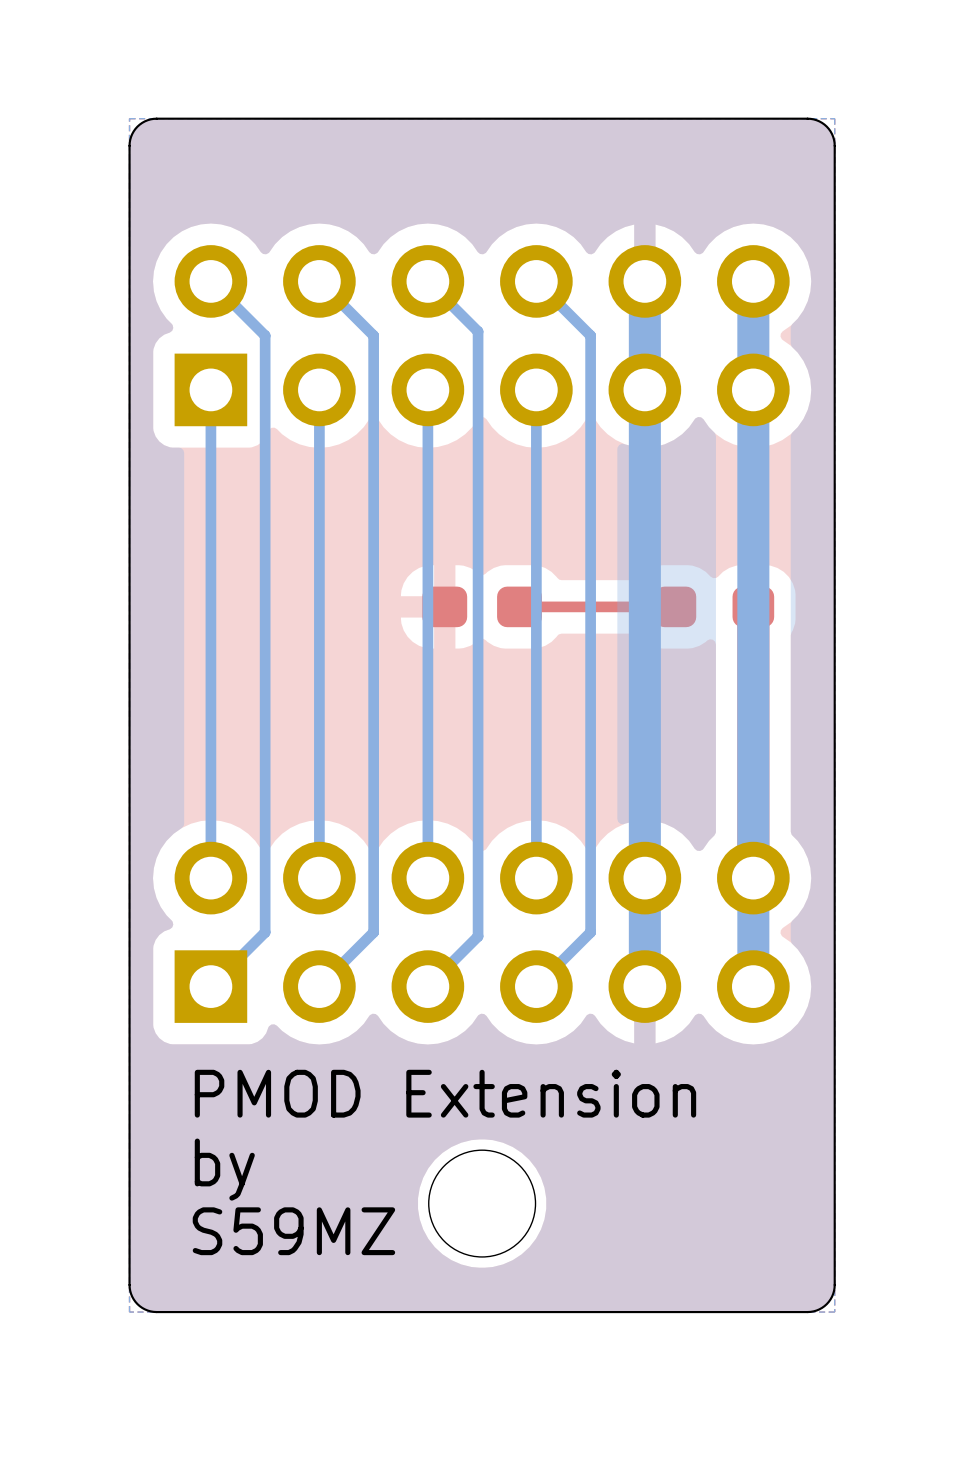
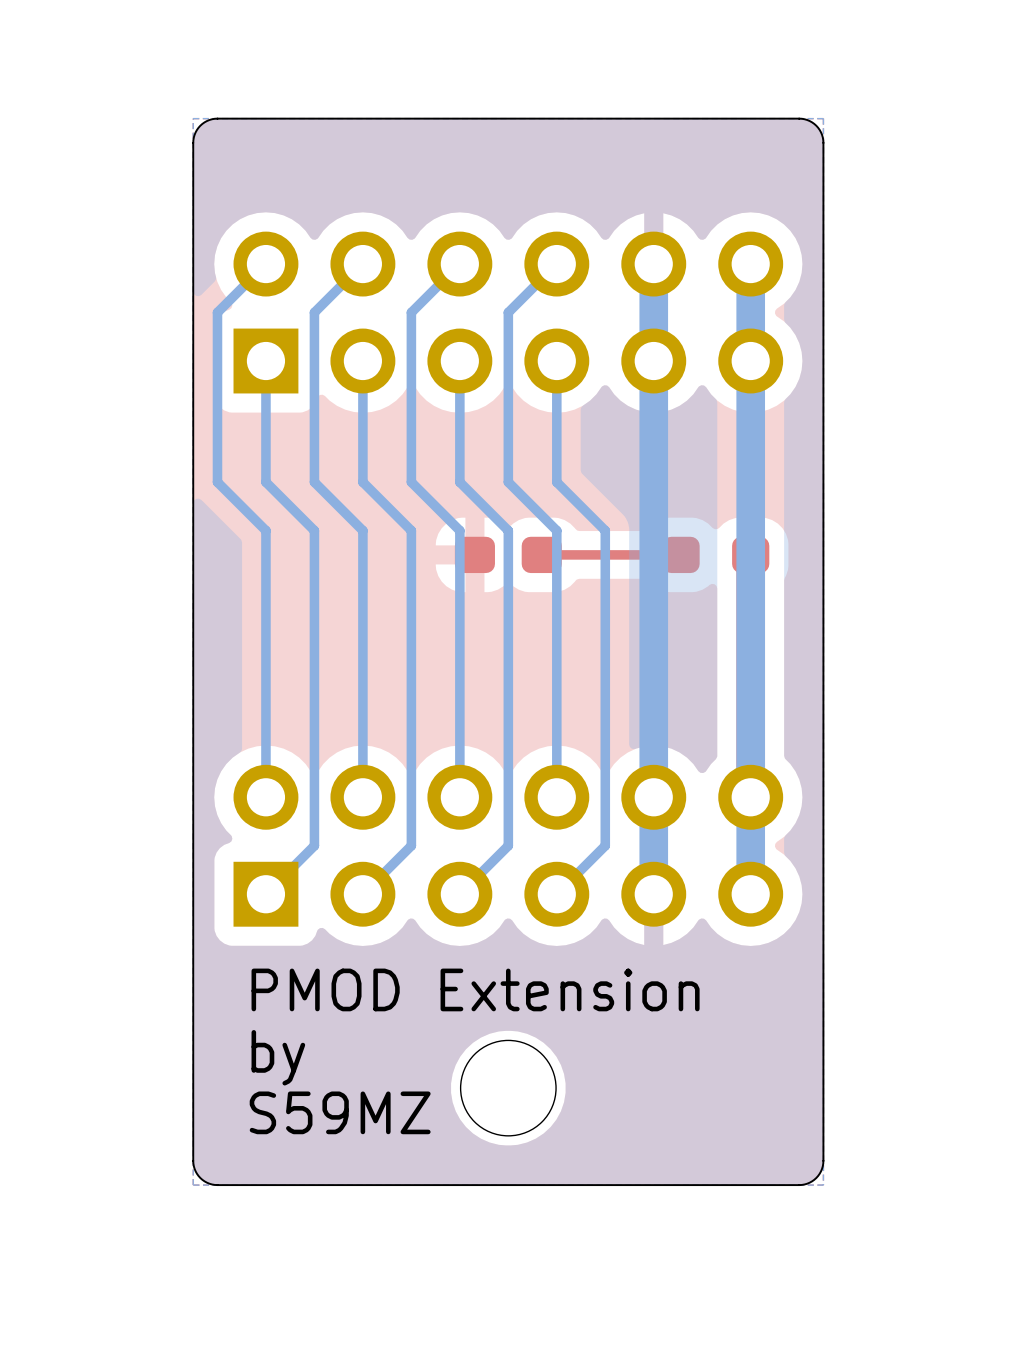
bottom track: (210, 281) (265, 335) -> (362, 264) (314, 312)
bottom track: (319, 281) (373, 335) -> (459, 264) (411, 312)
bottom track: (427, 281) (478, 331) (478, 936) -> (459, 482) (508, 530) (508, 845) (504, 849)
bottom track: (536, 281) (590, 335) (590, 579) -> (556, 264) (508, 312) (508, 482) (556, 530)
bottom track: (210, 525) (210, 579) -> (265, 264) (217, 312) (217, 482) (265, 530)
bottom track: (265, 525) (265, 579) -> (265, 482) (314, 530)
bottom track: (319, 525) (319, 579) -> (314, 482) (362, 530)
bottom track: (373, 525) (373, 579) -> (362, 482) (411, 530)
bottom track: (427, 525) (427, 579) -> (411, 482) (459, 530)
bottom track: (536, 525) (536, 579) -> (556, 482) (605, 530)

